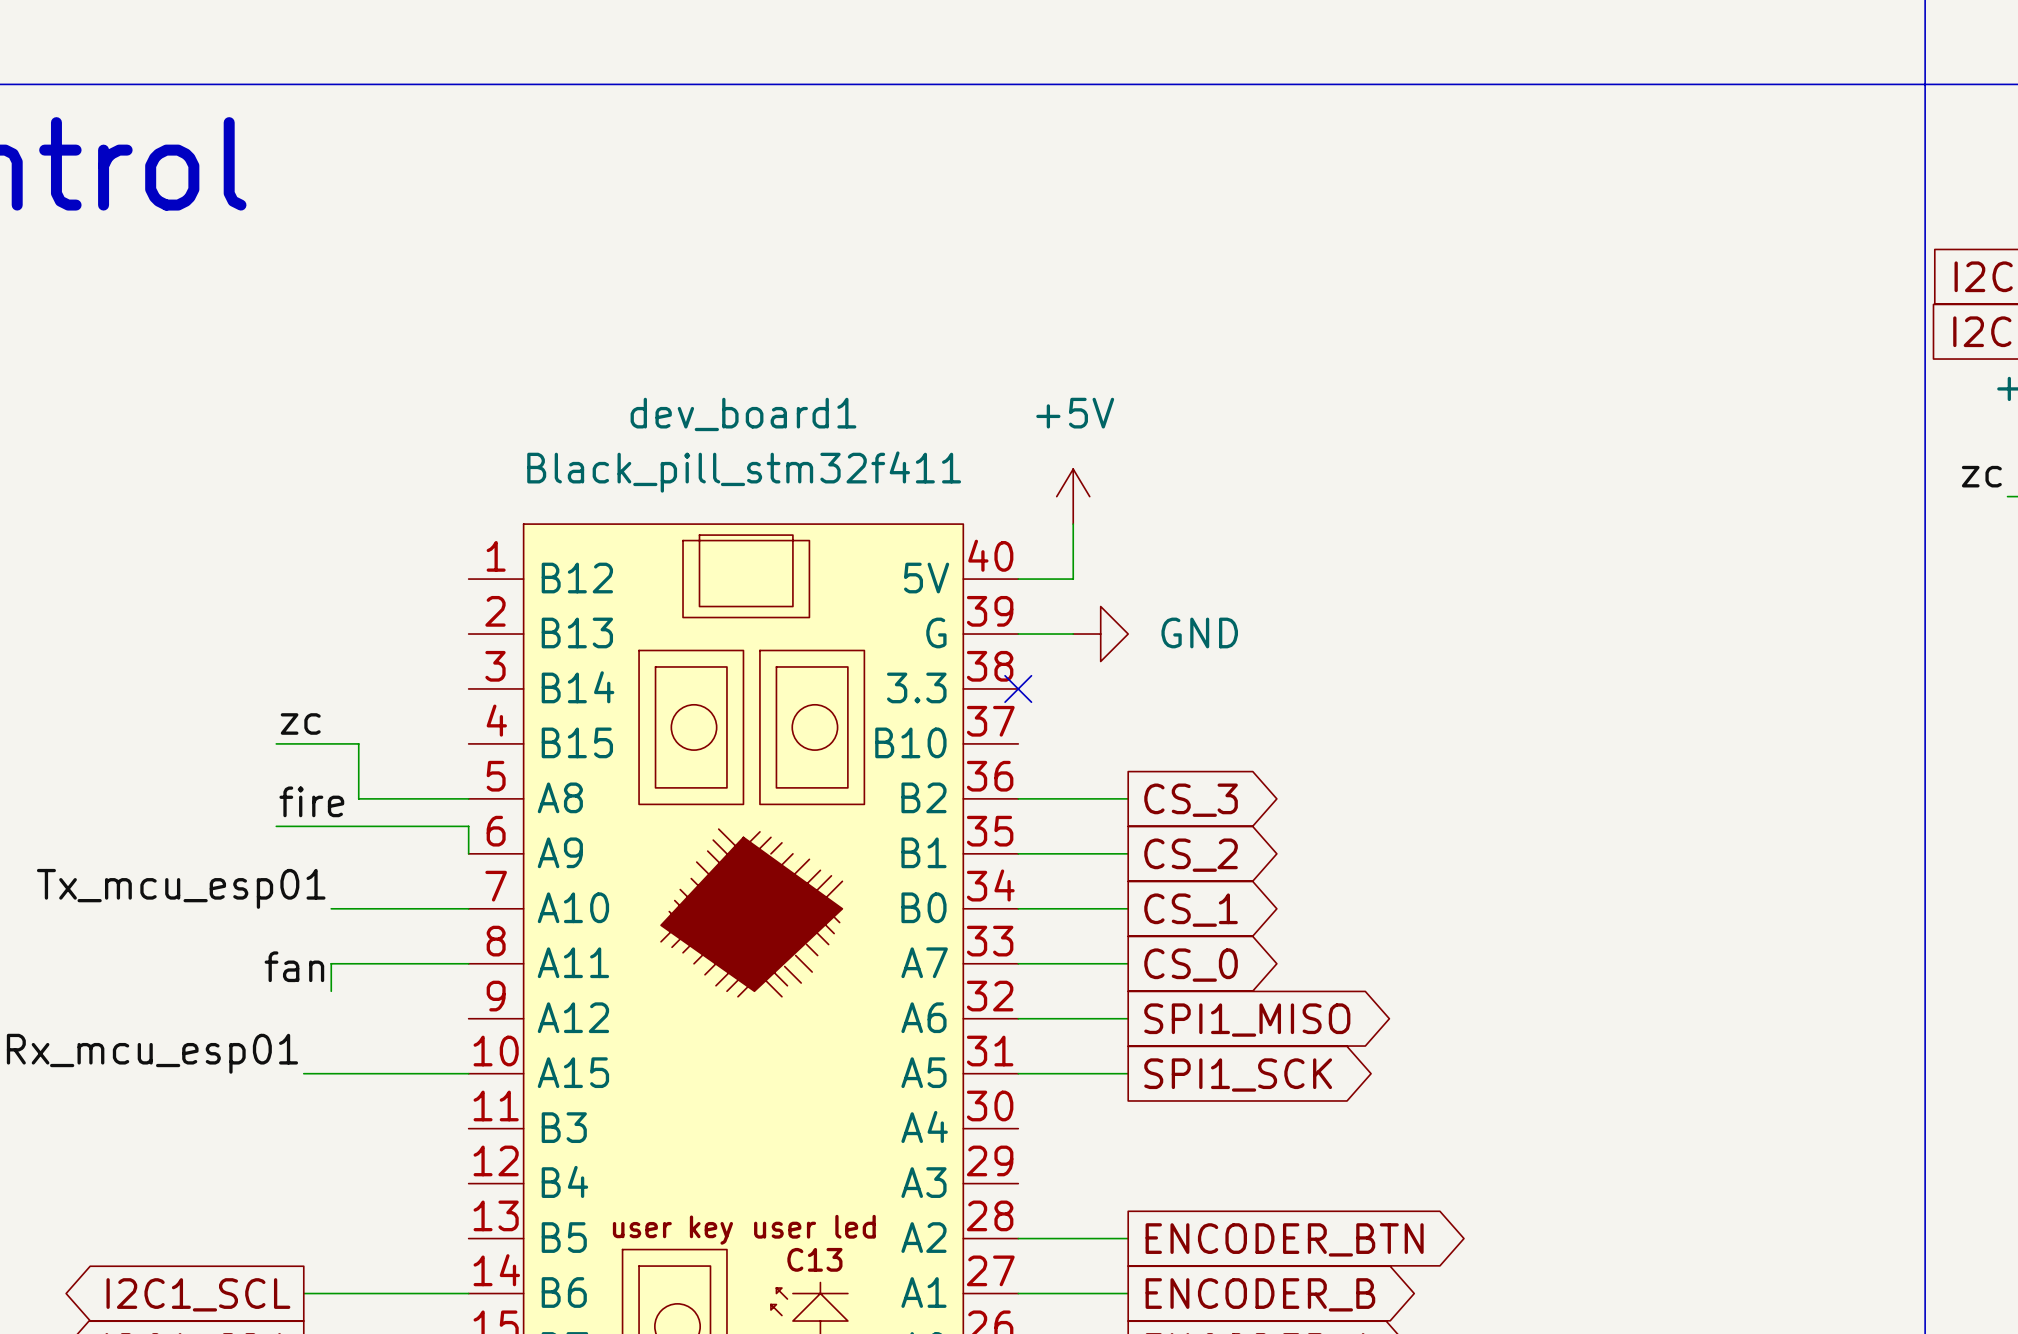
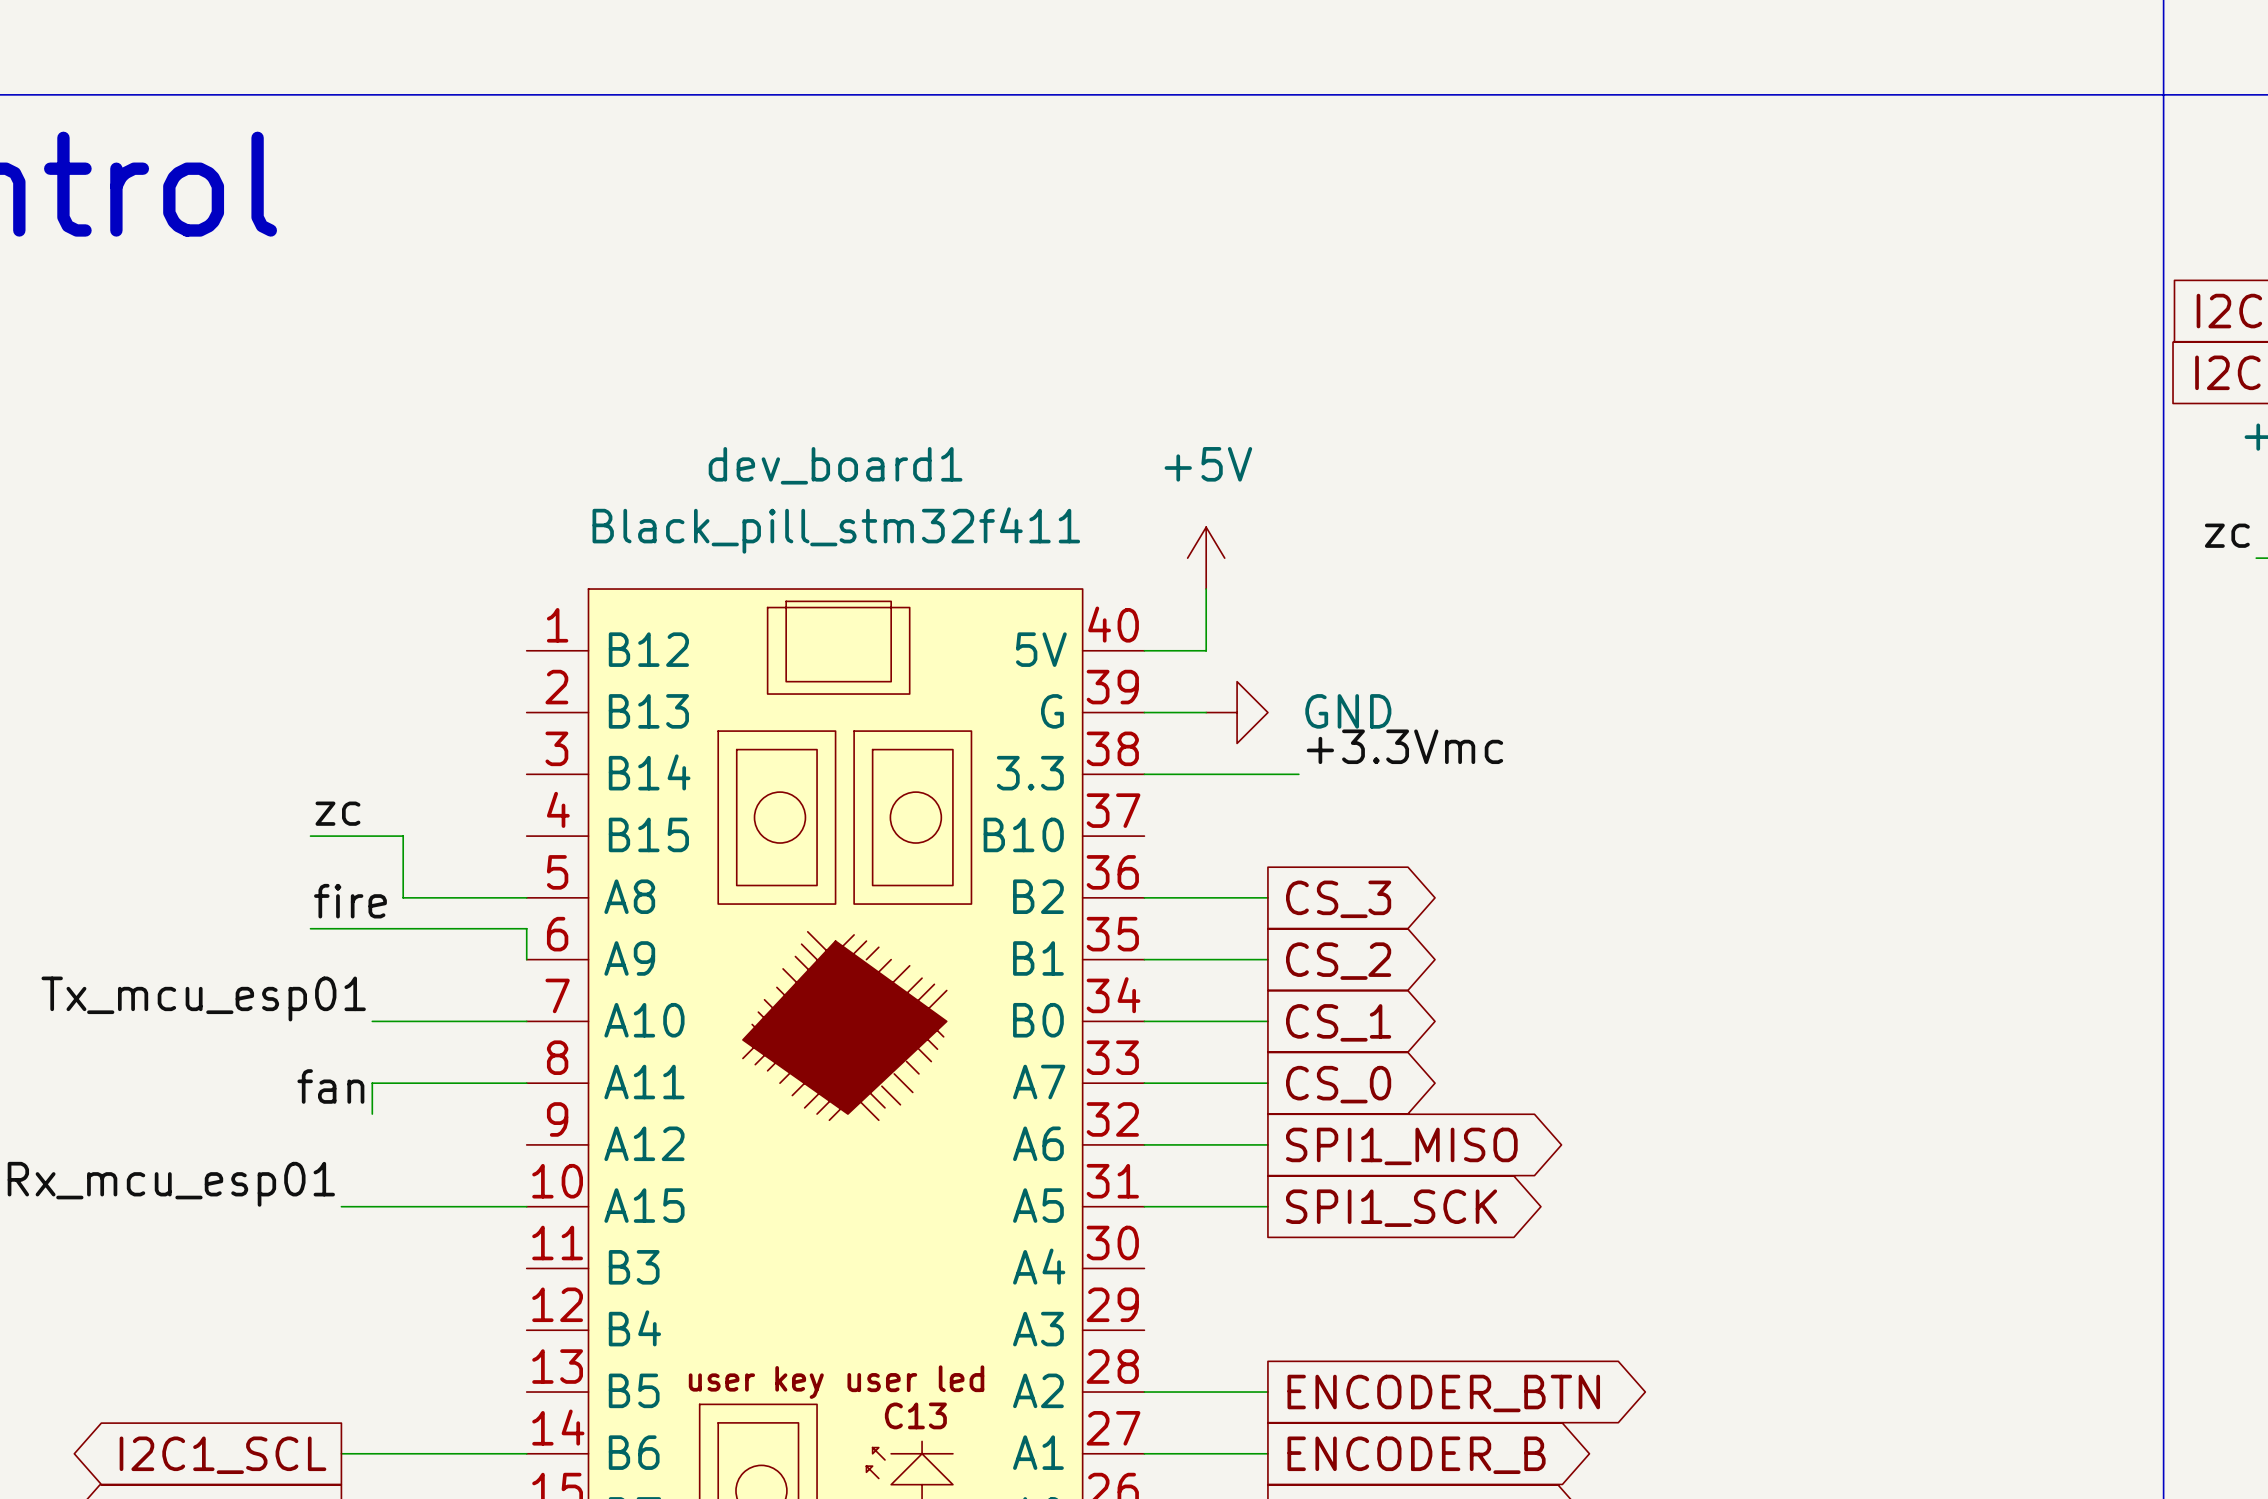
label: none -> +3.3Vmc (1404, 746)
wire: none -> (1144, 774) (1298, 774)
no-connect mark: (1018, 688) -> none

